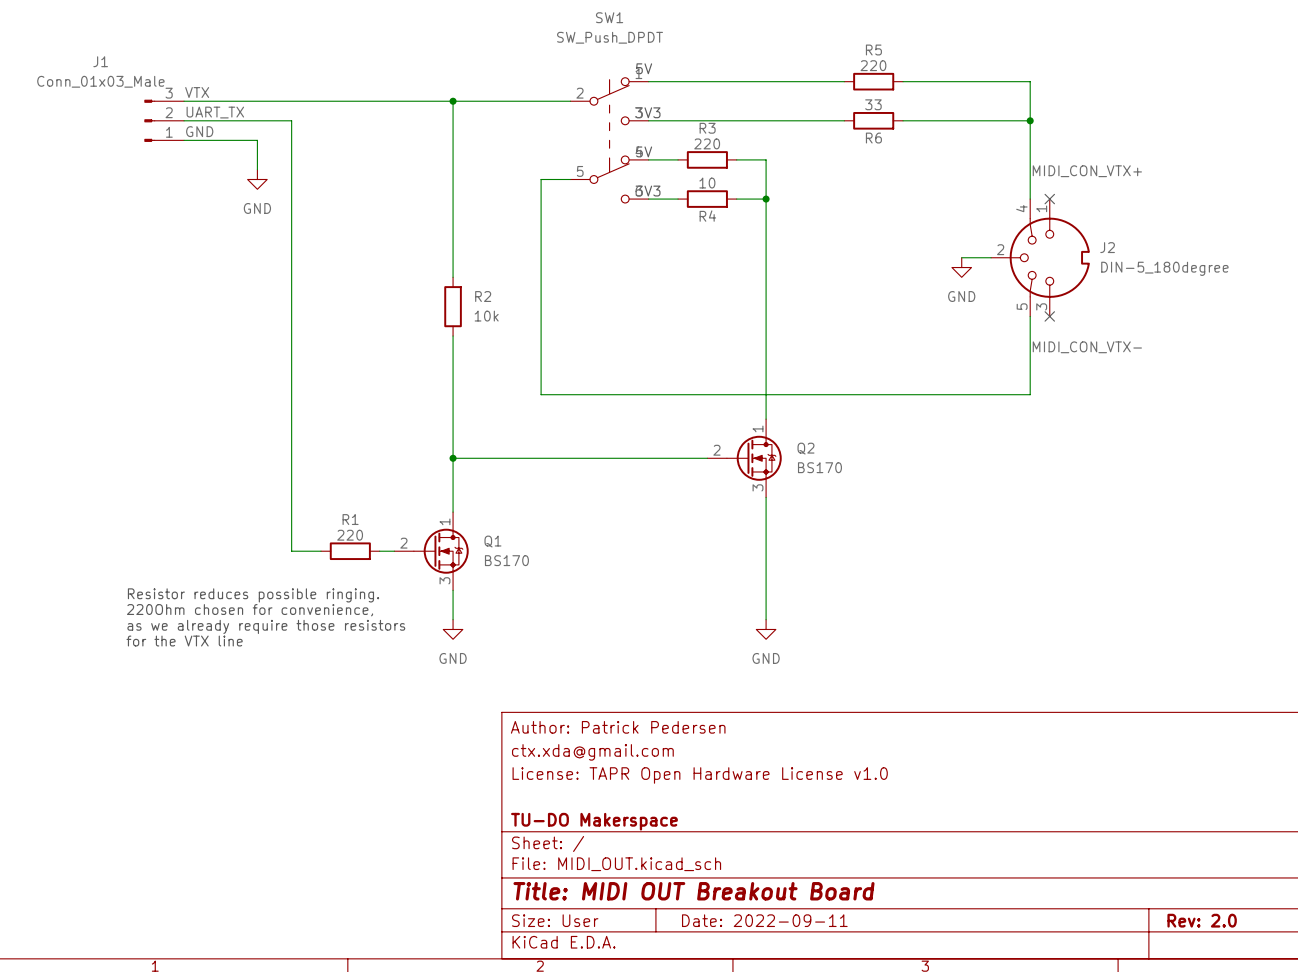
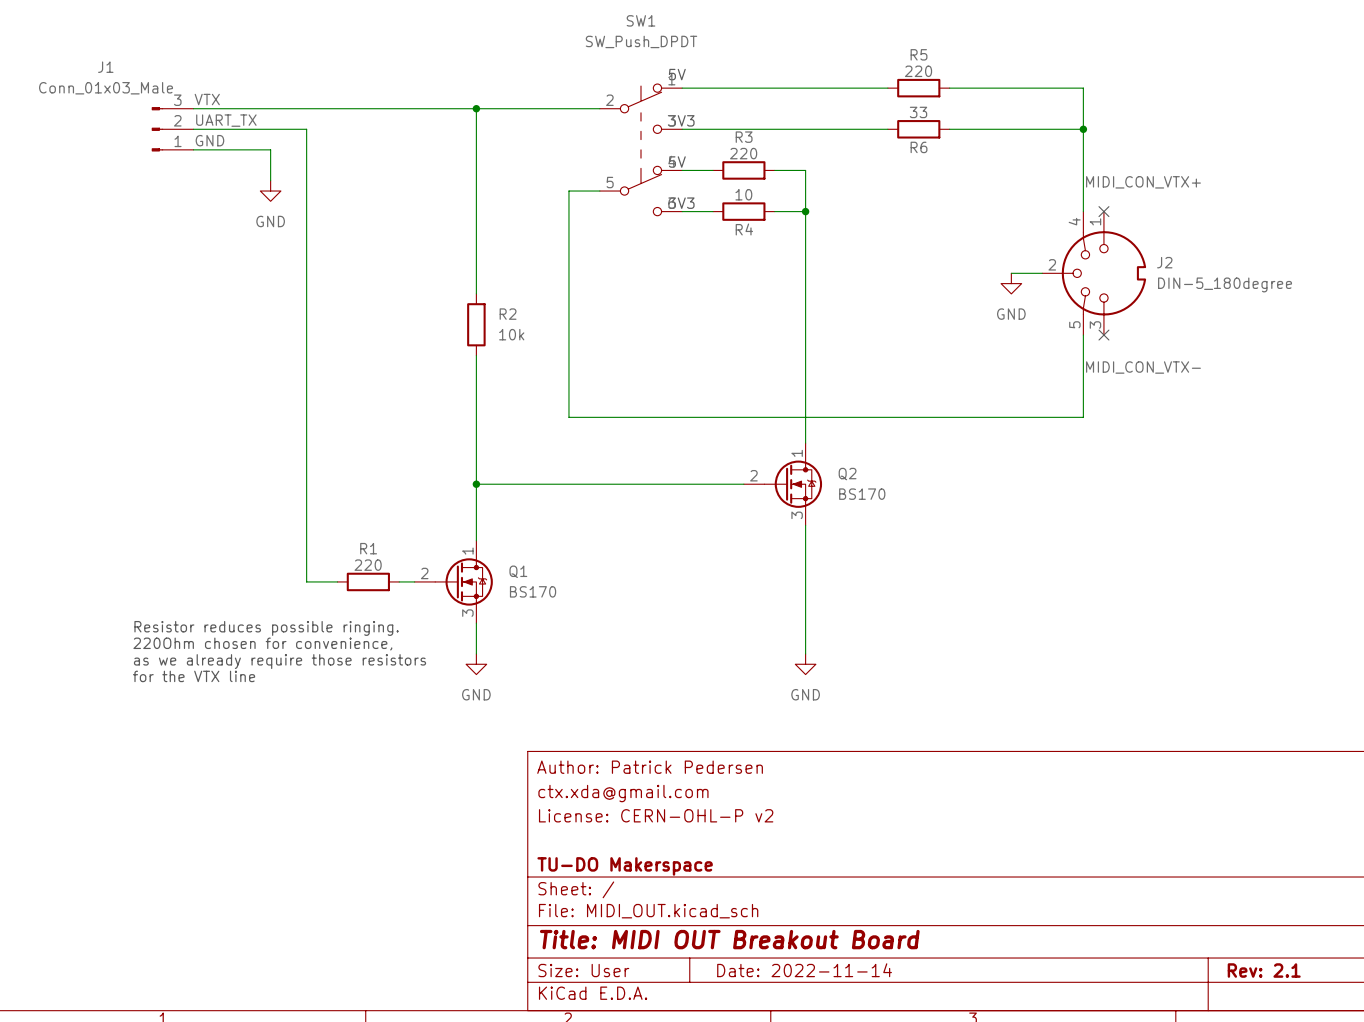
title block: License: TAPR Open Hardware License v1.0 (700, 775) -> License: CERN-OHL-P v2 (656, 815)
title block: Date: 2022-09-11 (764, 920) -> Date: 2022-11-14 (804, 970)
title block: Rev: 2.0 (1202, 920) -> Rev: 2.1 (1264, 970)

